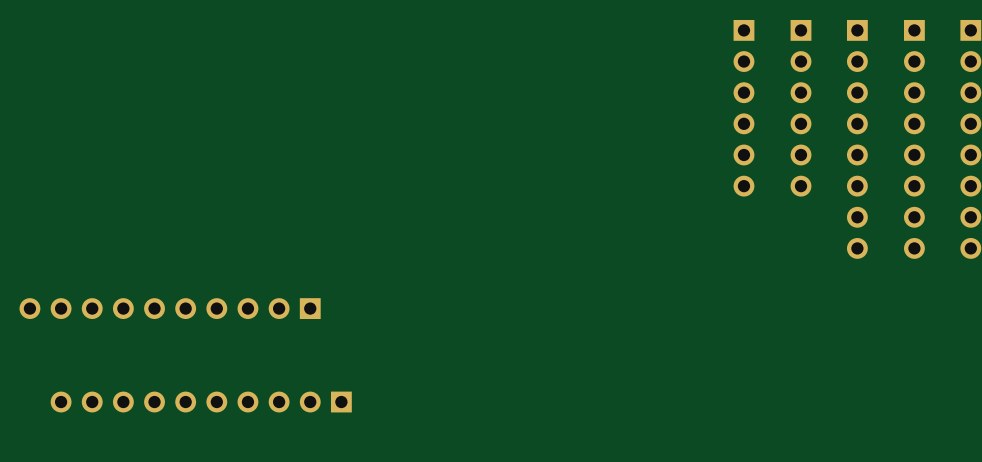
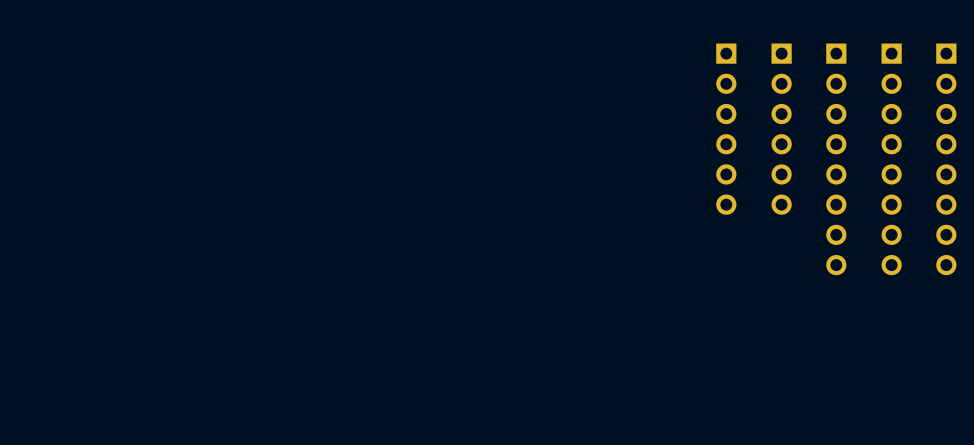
part: (170, 308) -> none
part: (201, 402) -> none

